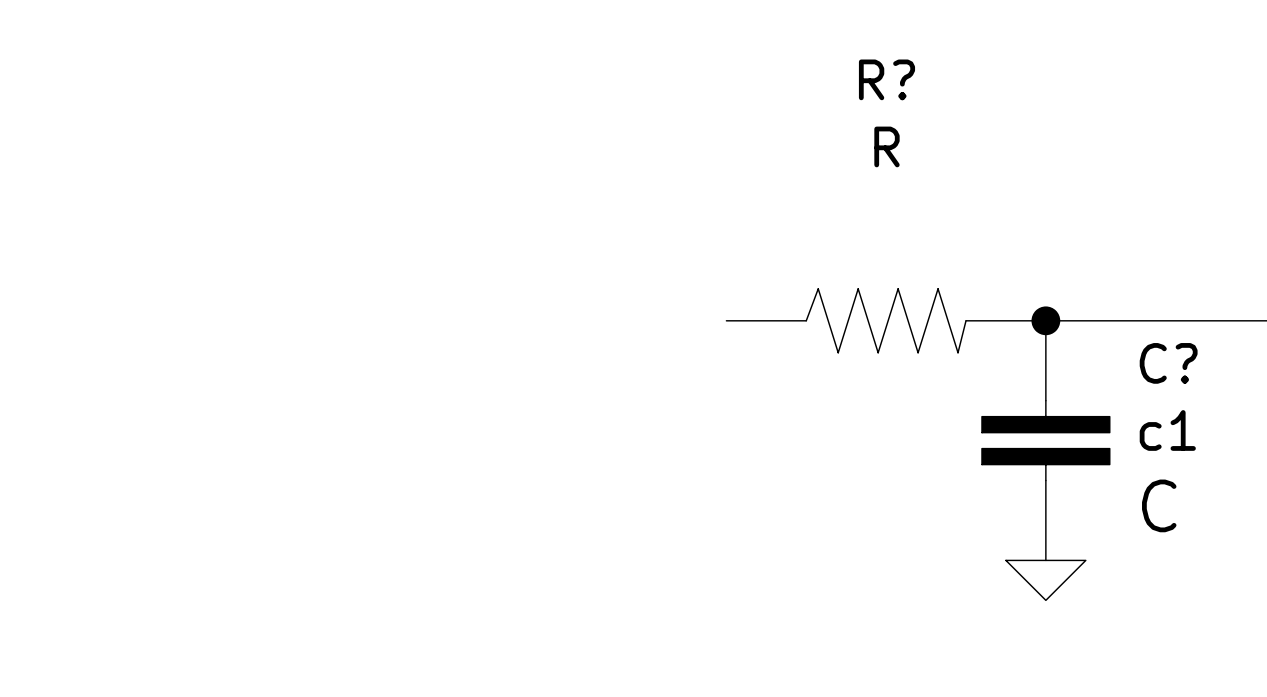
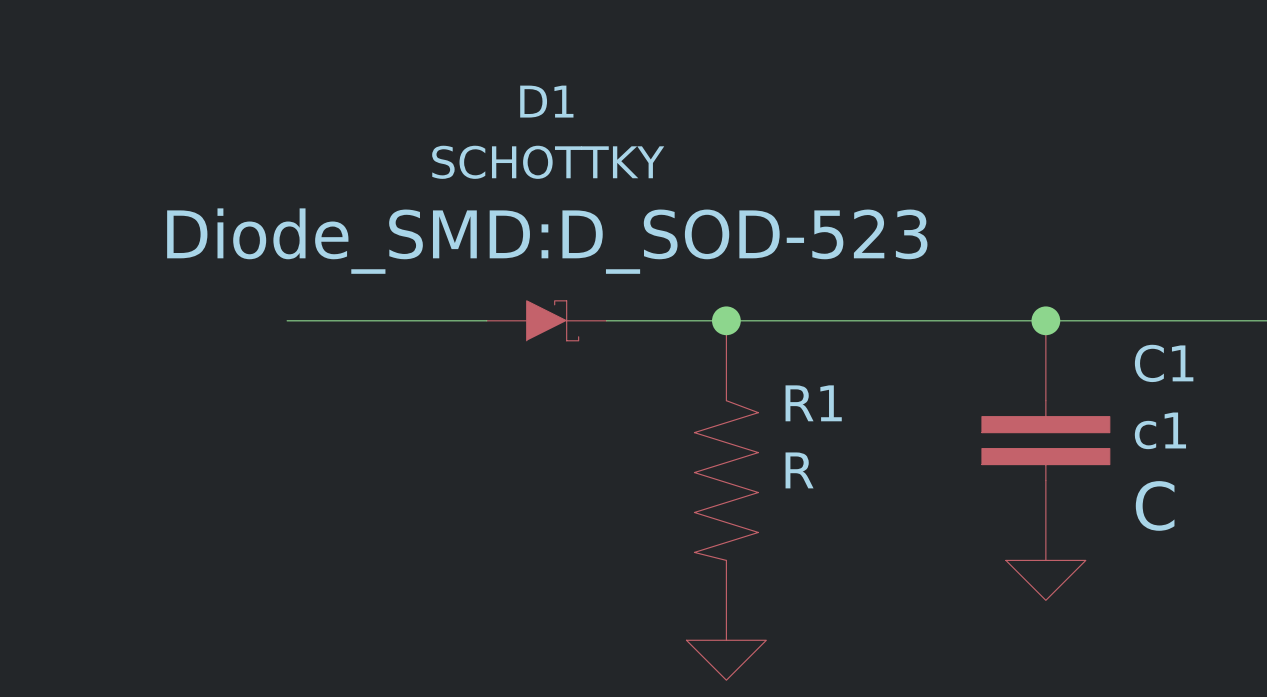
wire: none -> (287, 320) (486, 320)
D1: none -> SCHOTTKY (546, 320)
wire: none -> (606, 320) (1045, 320)
junction: none -> (726, 320)
R?: R (886, 320) -> none
C? name: C? (1168, 363) -> C1 (1164, 363)
R1: none -> R (726, 480)
power symbol: none -> (726, 660)

